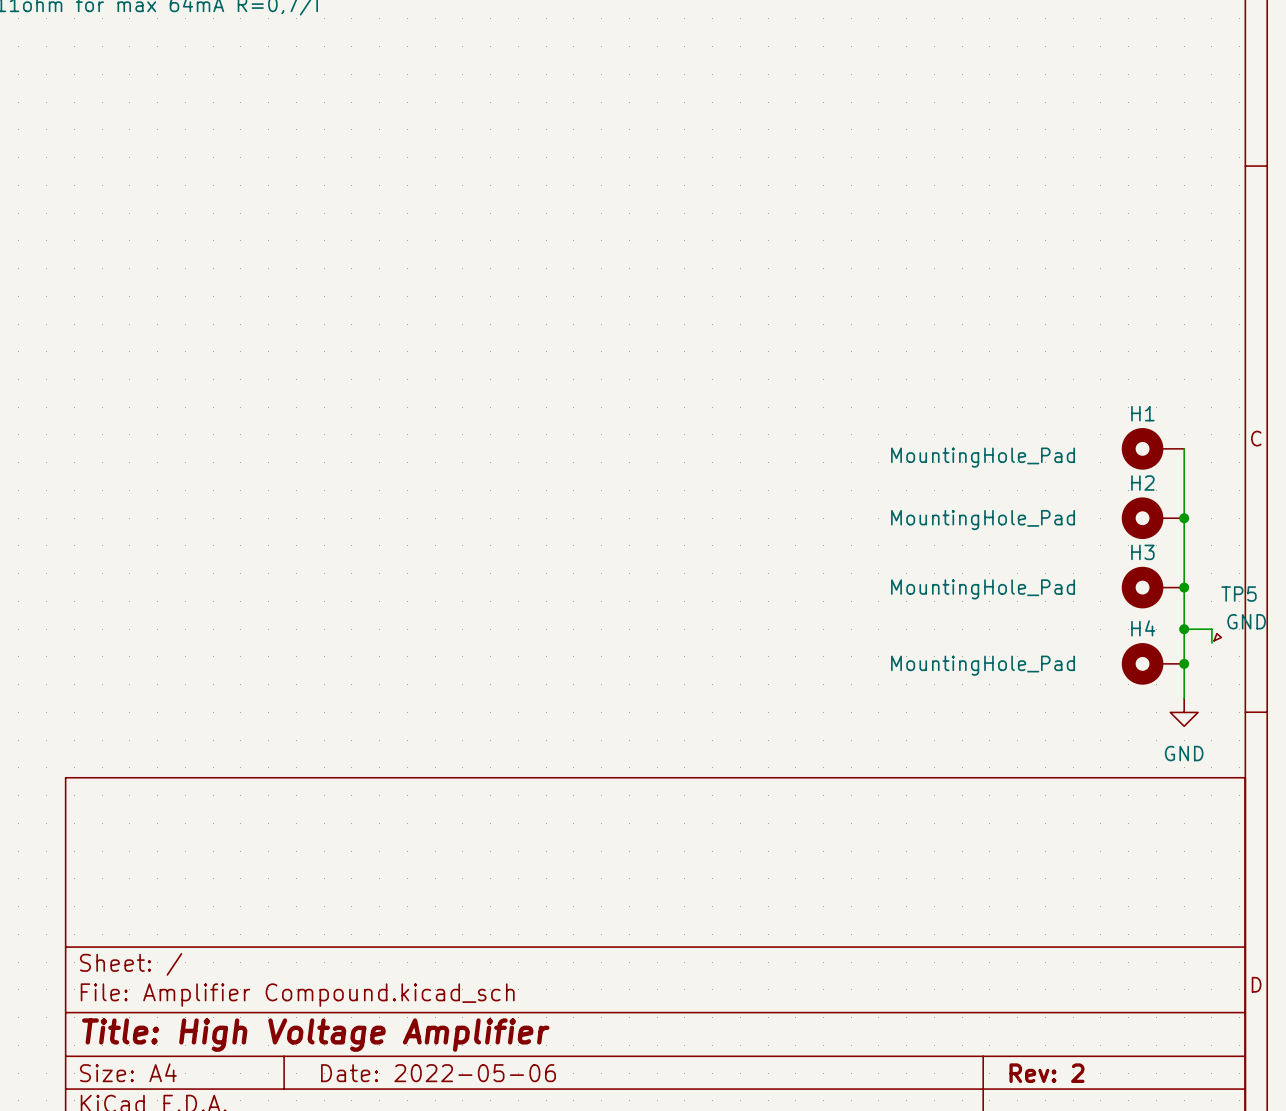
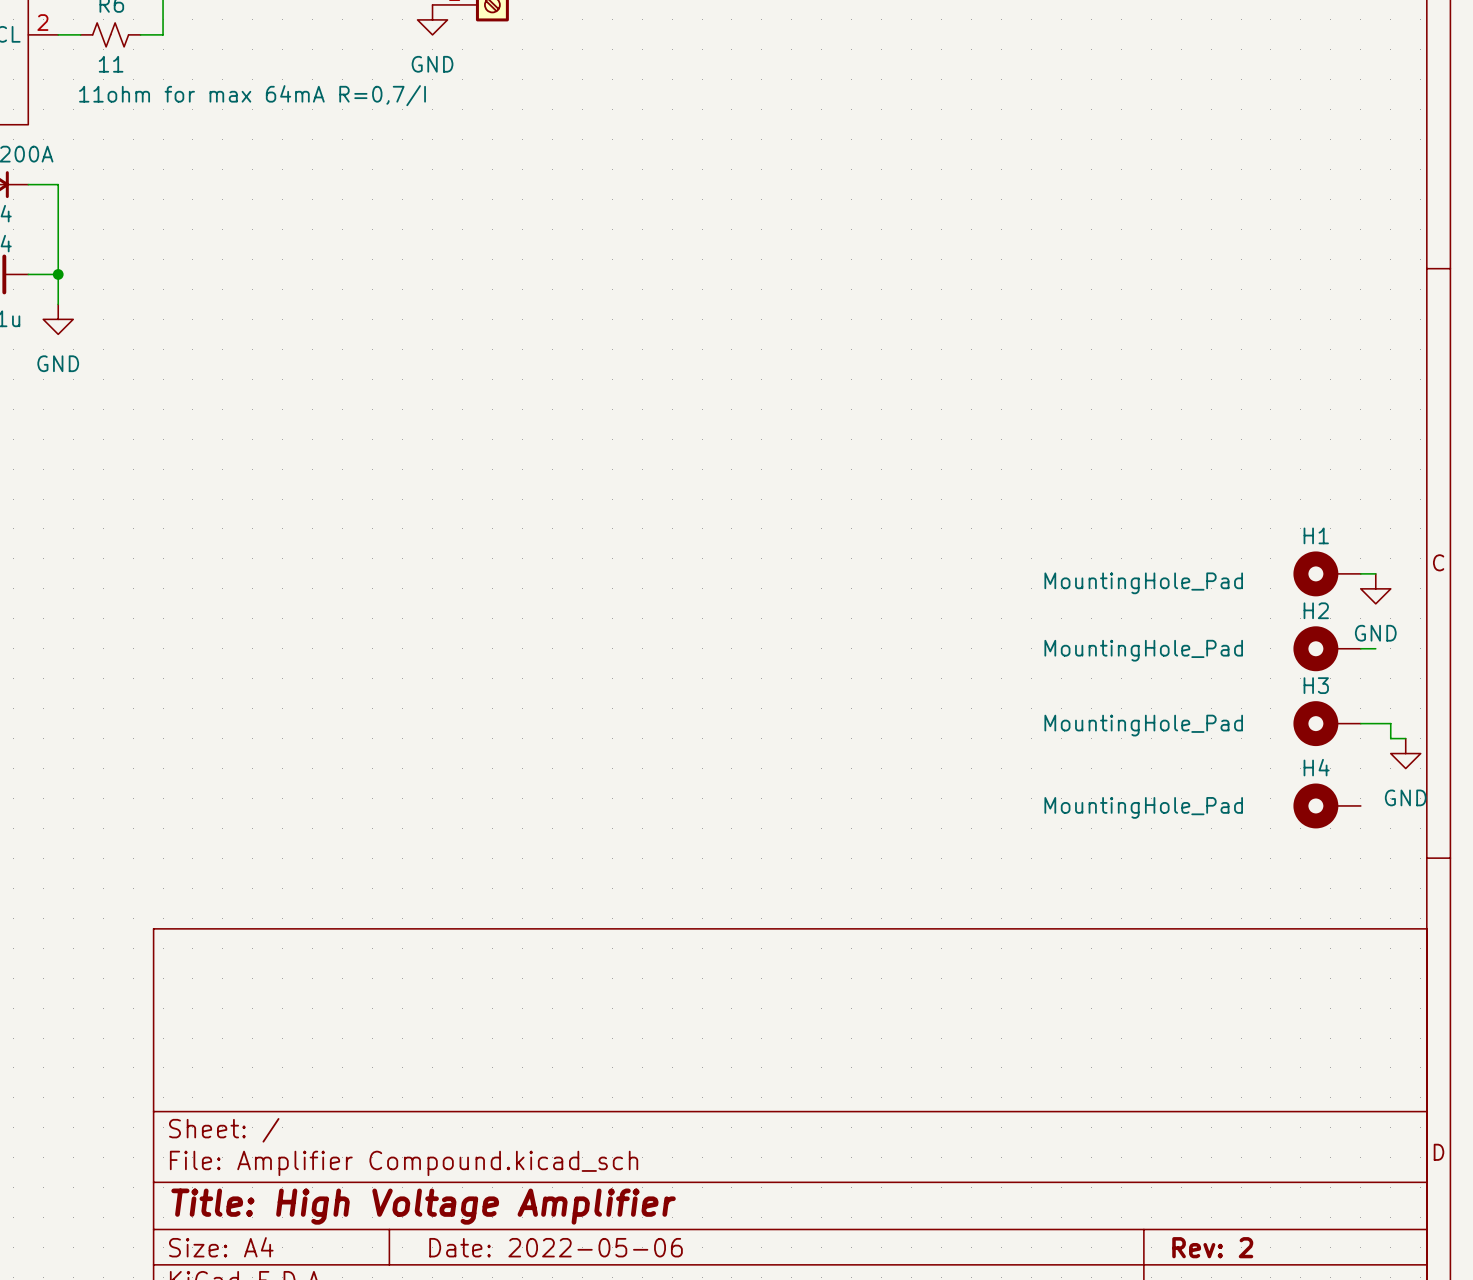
wire: (1184, 448) (1184, 698) -> (1360, 573) (1375, 573)
power symbol: none -> GND (1375, 588)
wire: none -> (1360, 648) (1375, 648)
junction: (1184, 518) -> none
wire: none -> (1360, 723) (1390, 723) (1390, 738) (1405, 738)
junction: (1184, 587) -> none
wire: (1184, 629) (1211, 629) (1211, 643) -> none
junction: (1184, 629) -> none
TP5: GND (1216, 638) -> none
junction: (1184, 663) -> none
power symbol position: GND (1184, 712) -> GND (1405, 753)

